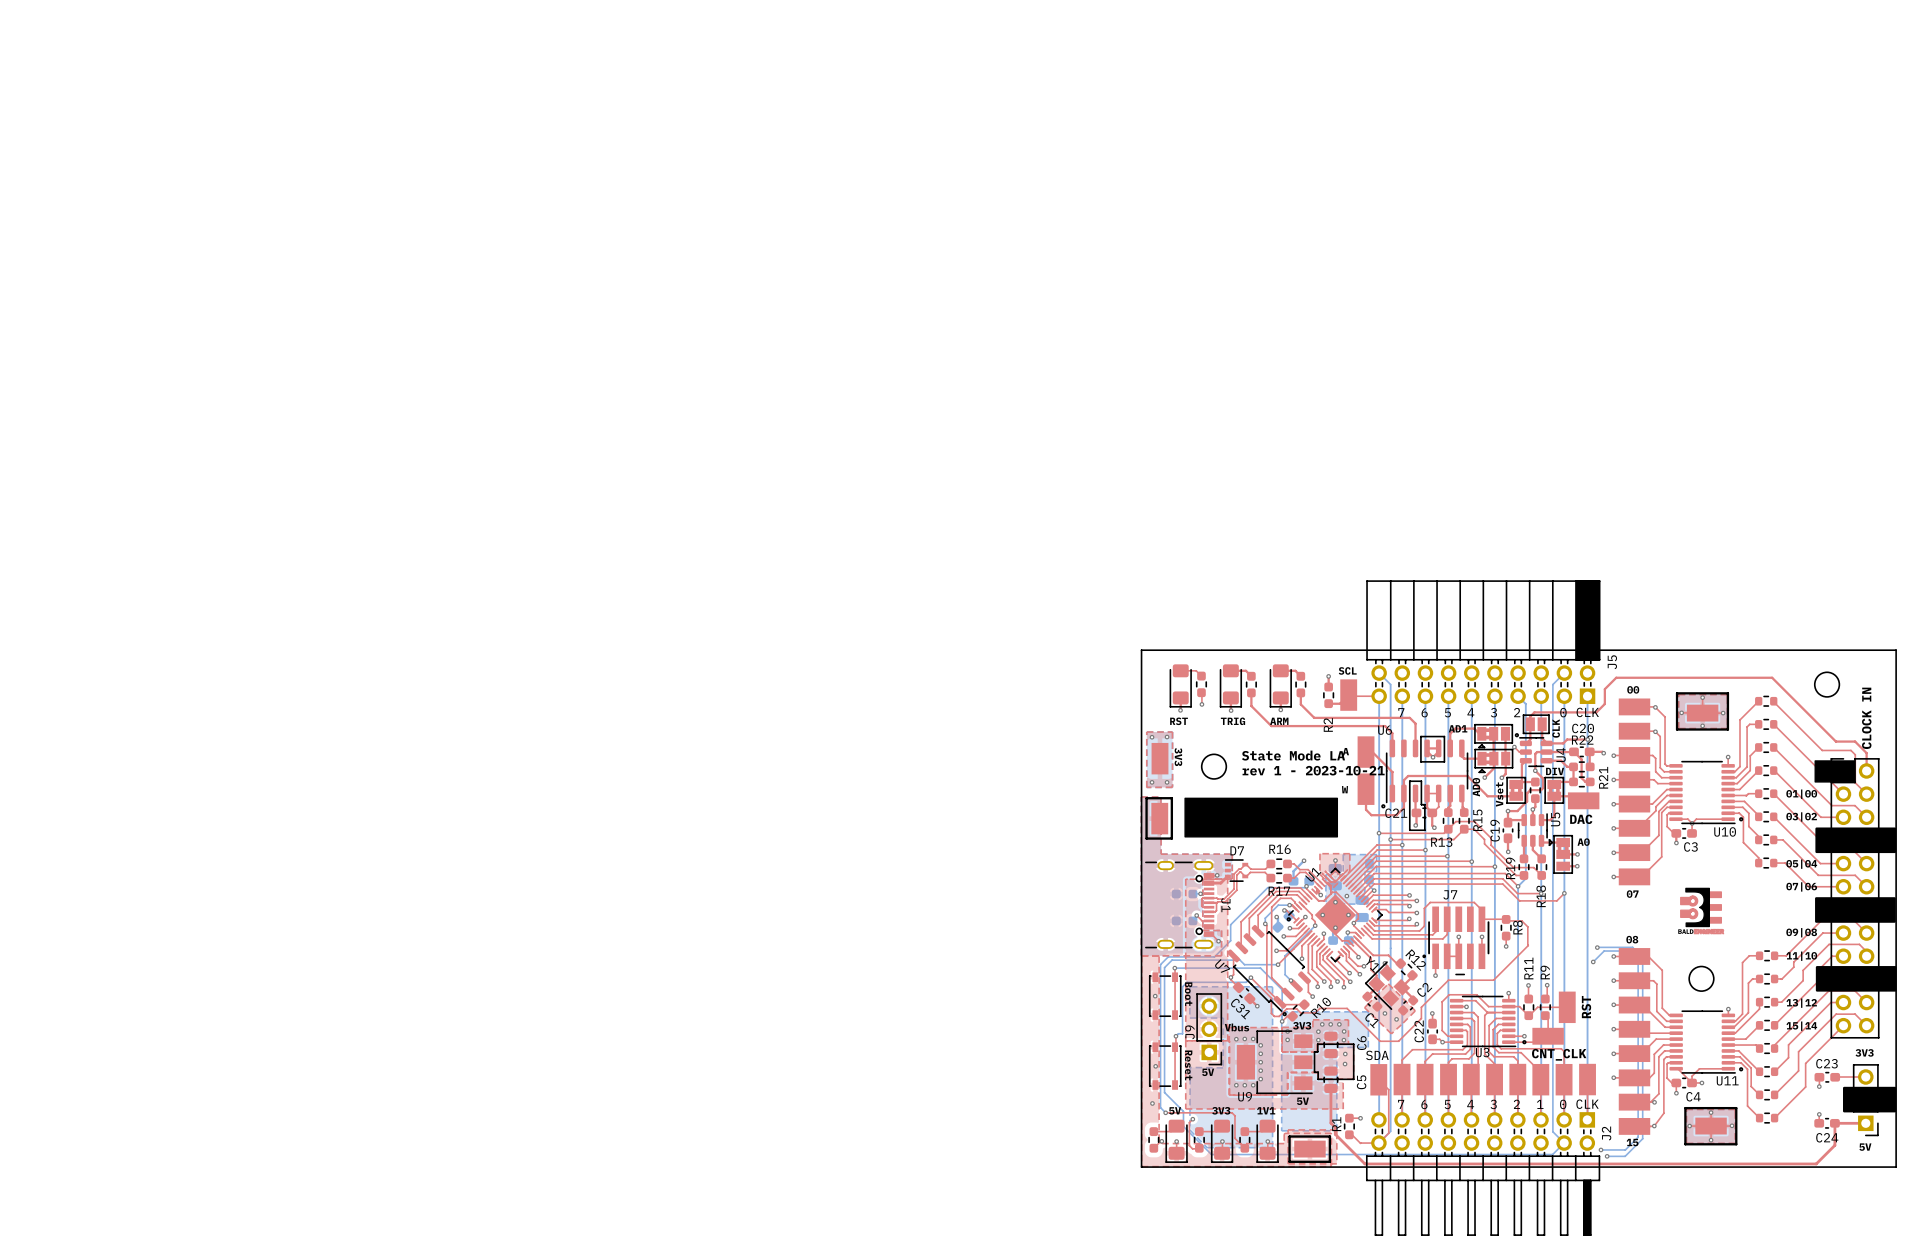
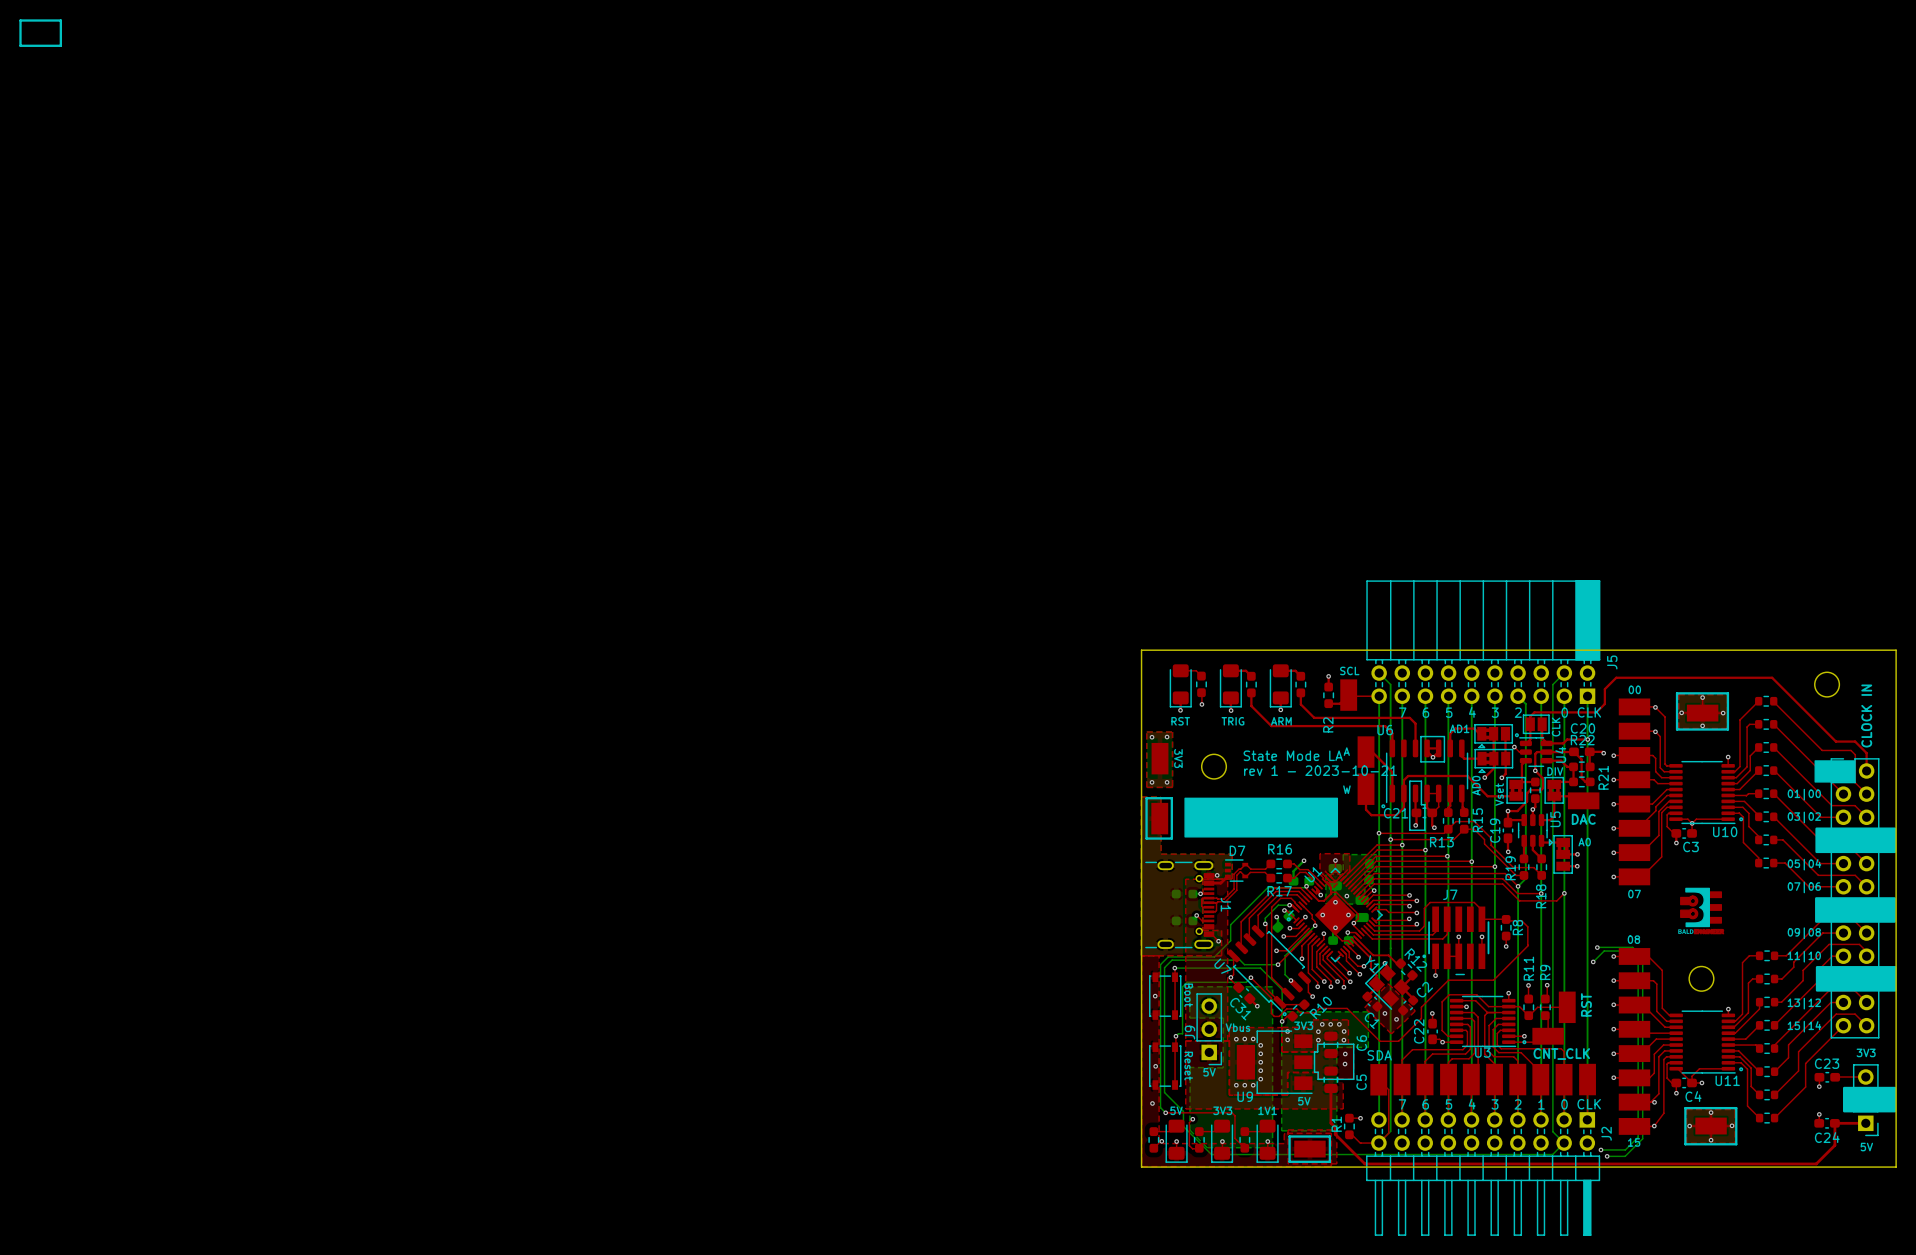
line: none -> (20, 20) (60, 20) (60, 45) (20, 45) (20, 20)

